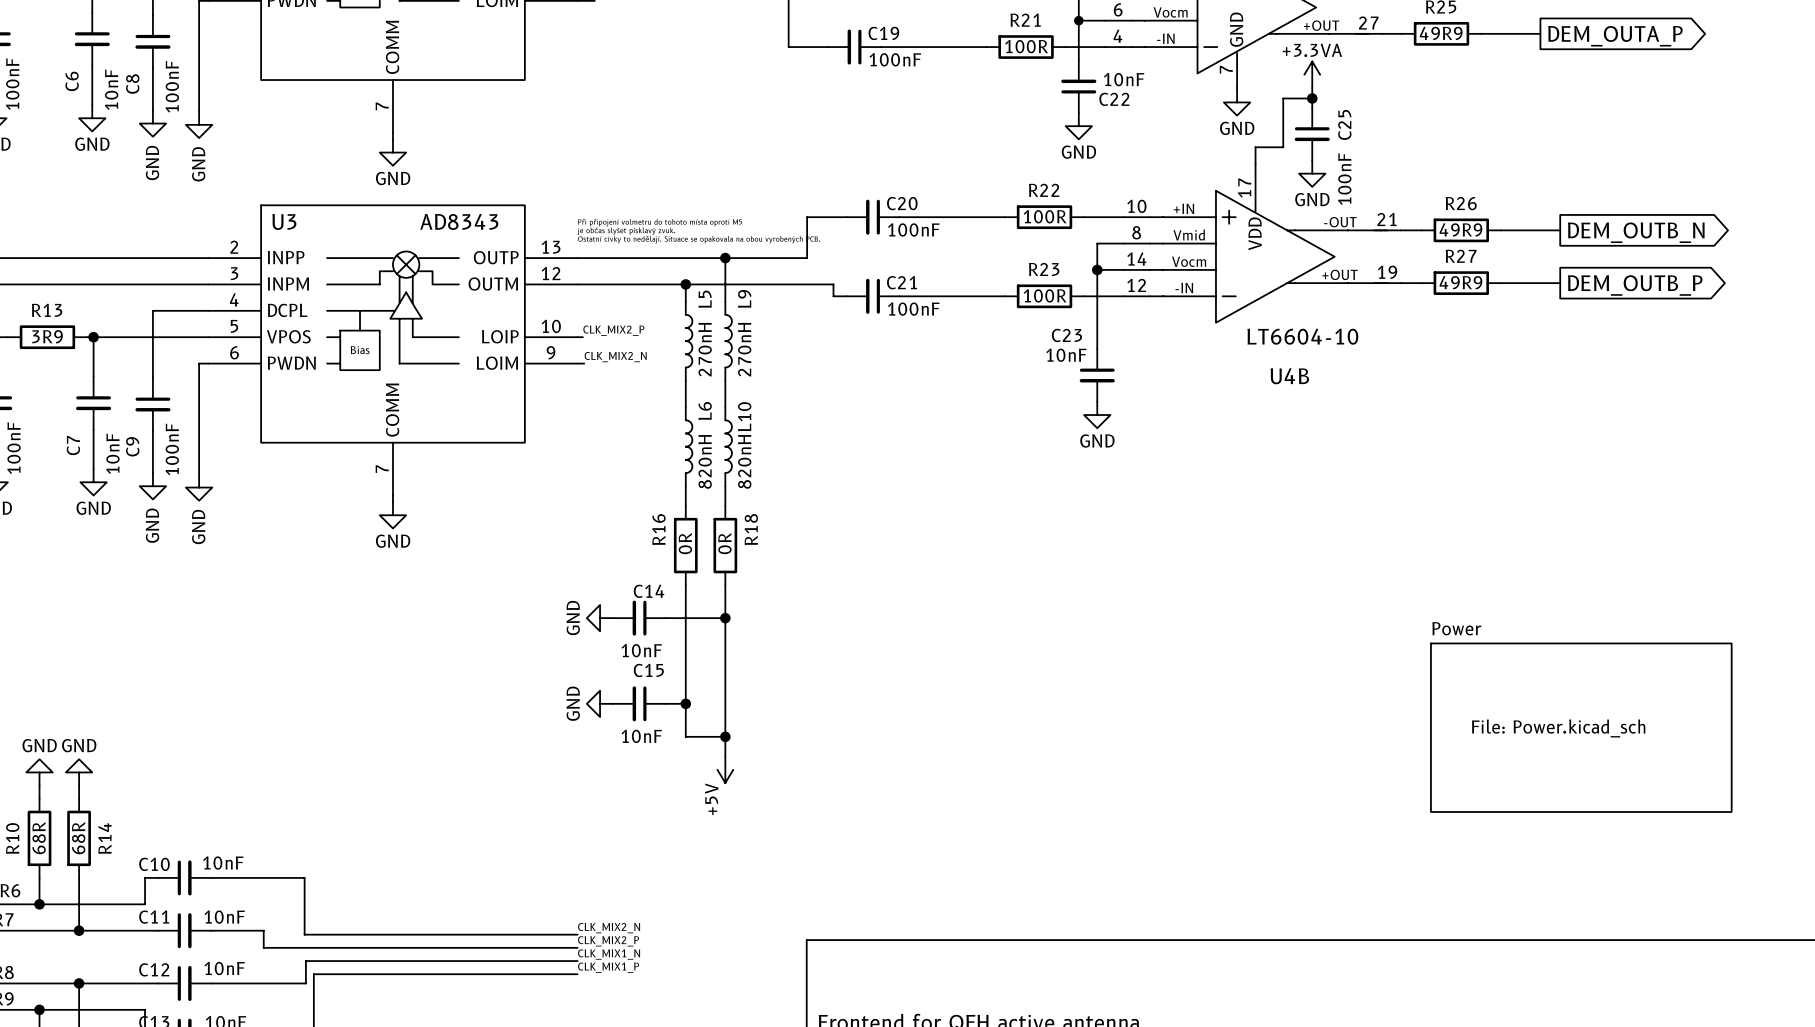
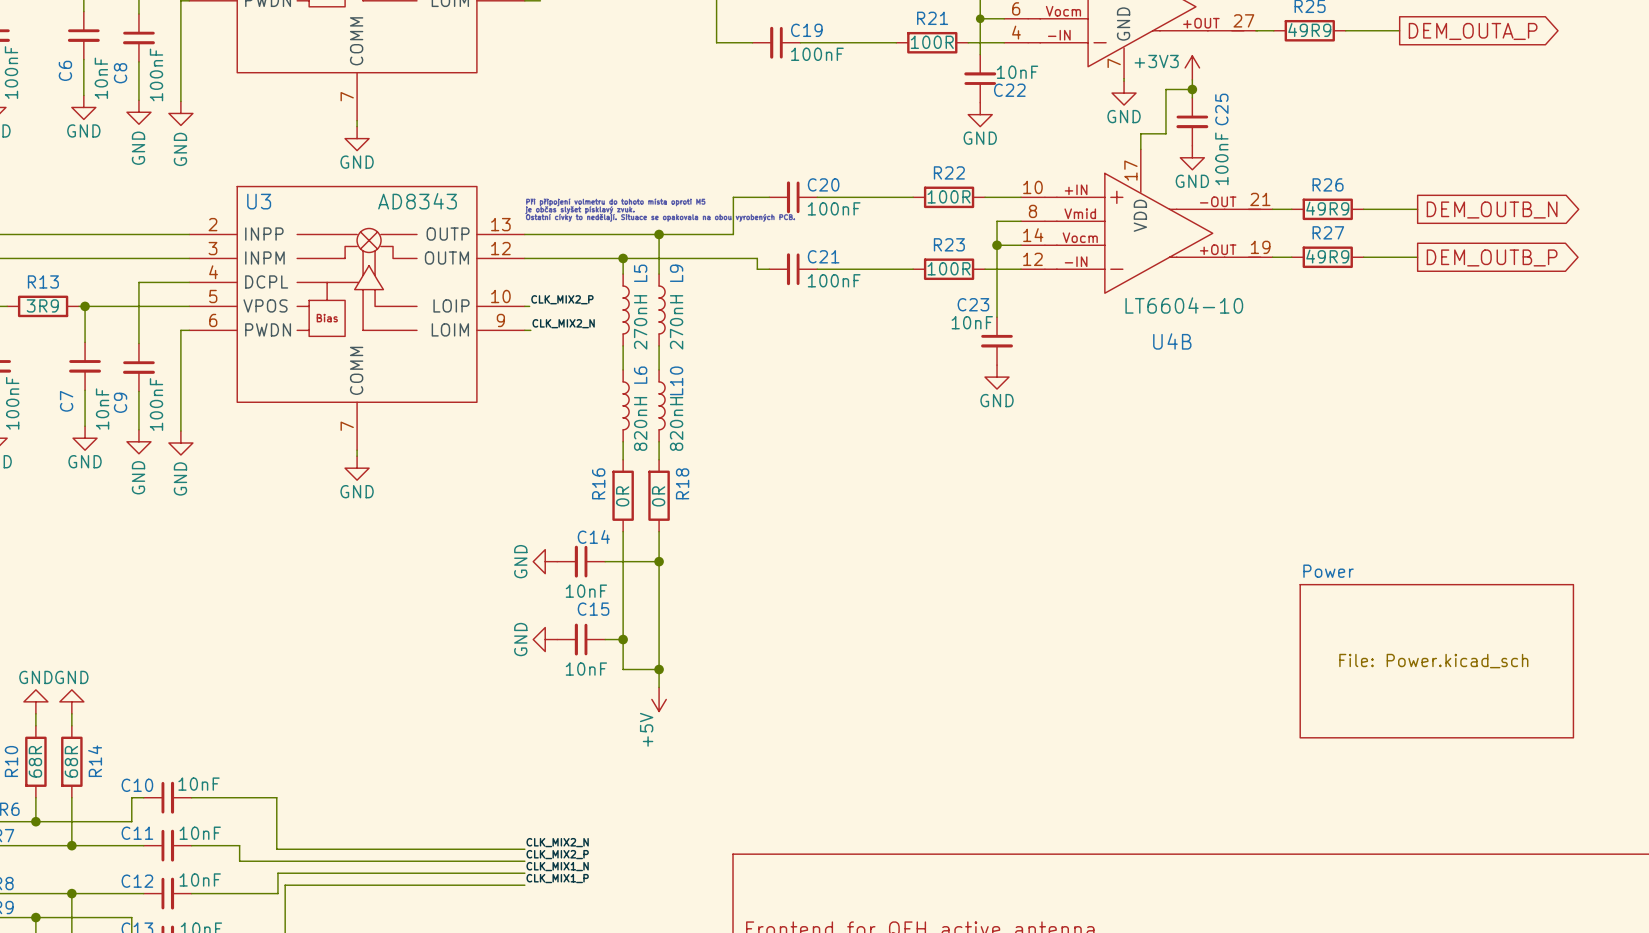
power symbol: +3.3VA (1312, 74) -> +3V3 (1192, 67)

